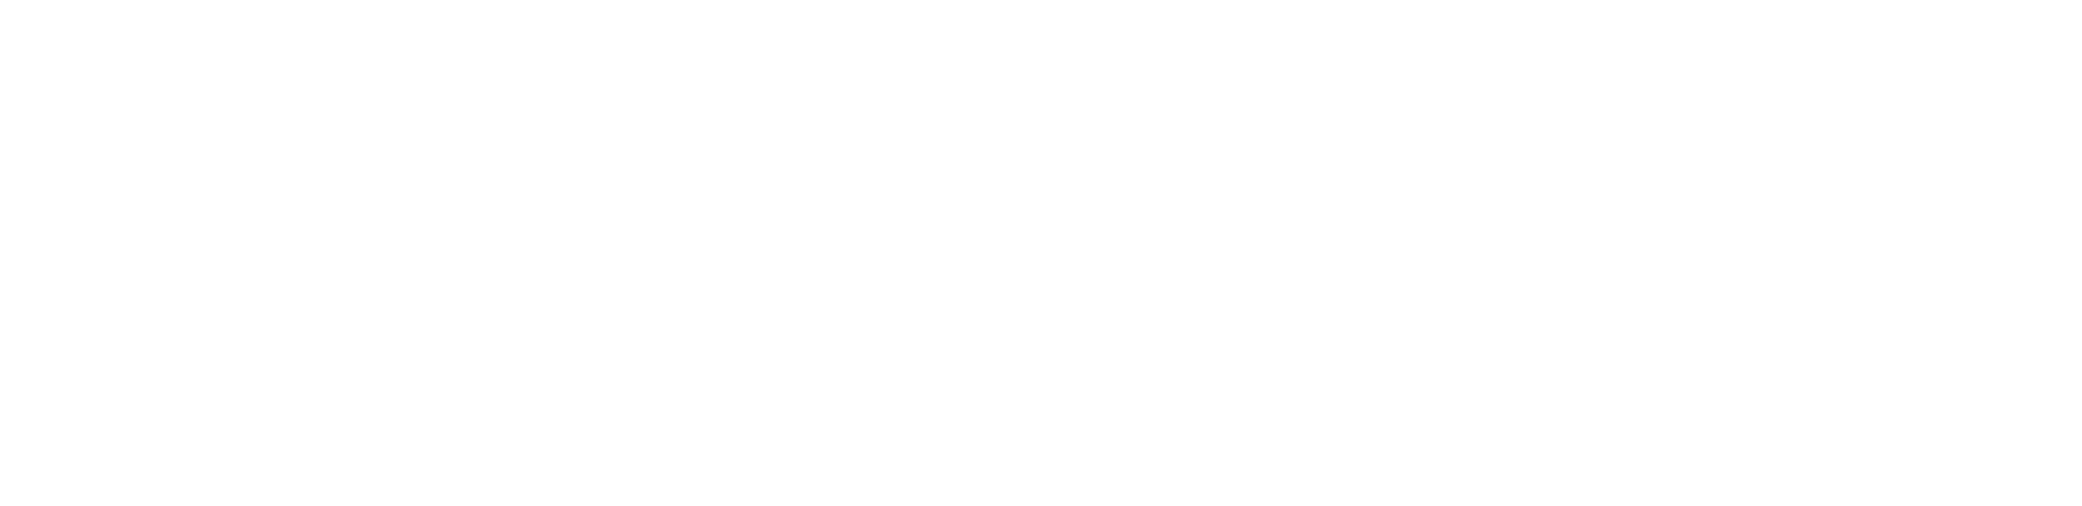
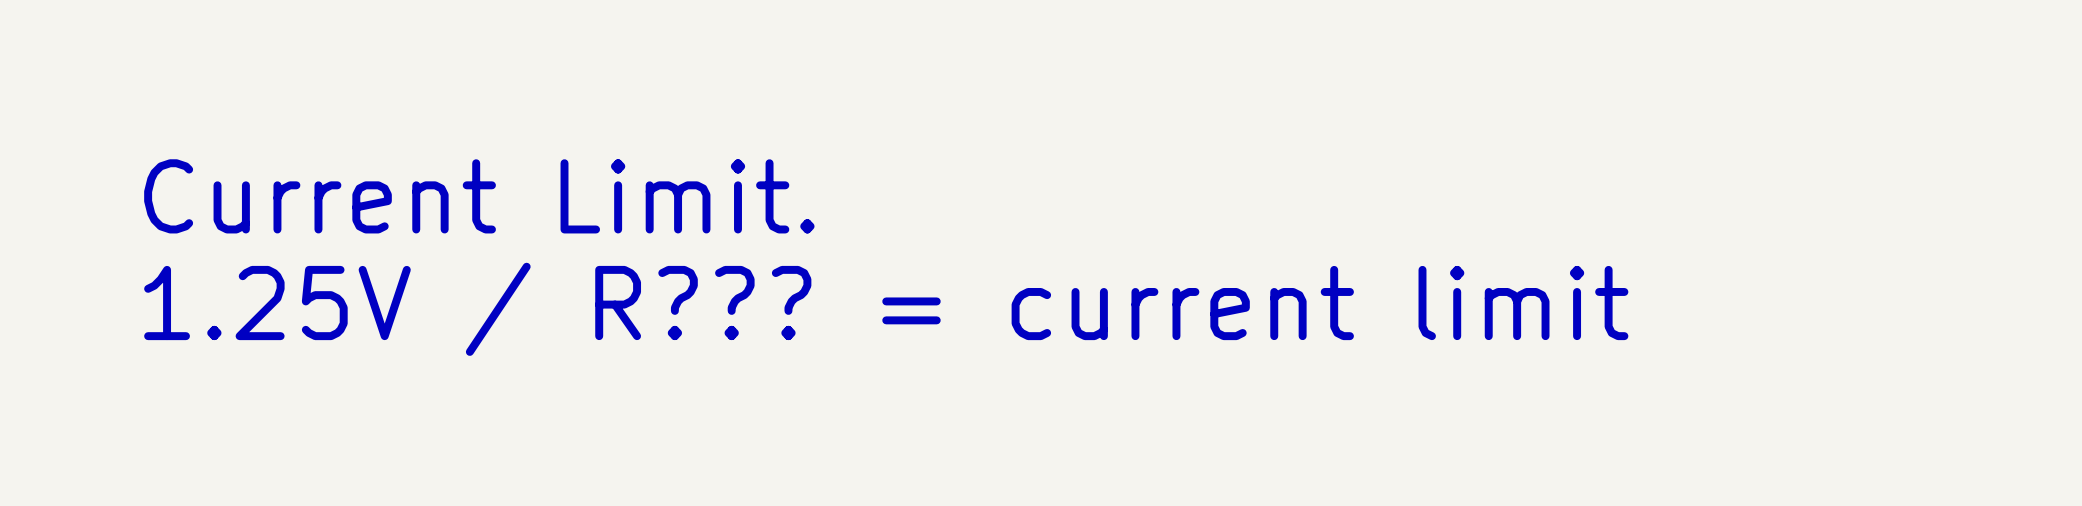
text: none -> Current Limit. (479, 196)
text: none -> 1.25V / R??? = current limit (886, 309)

